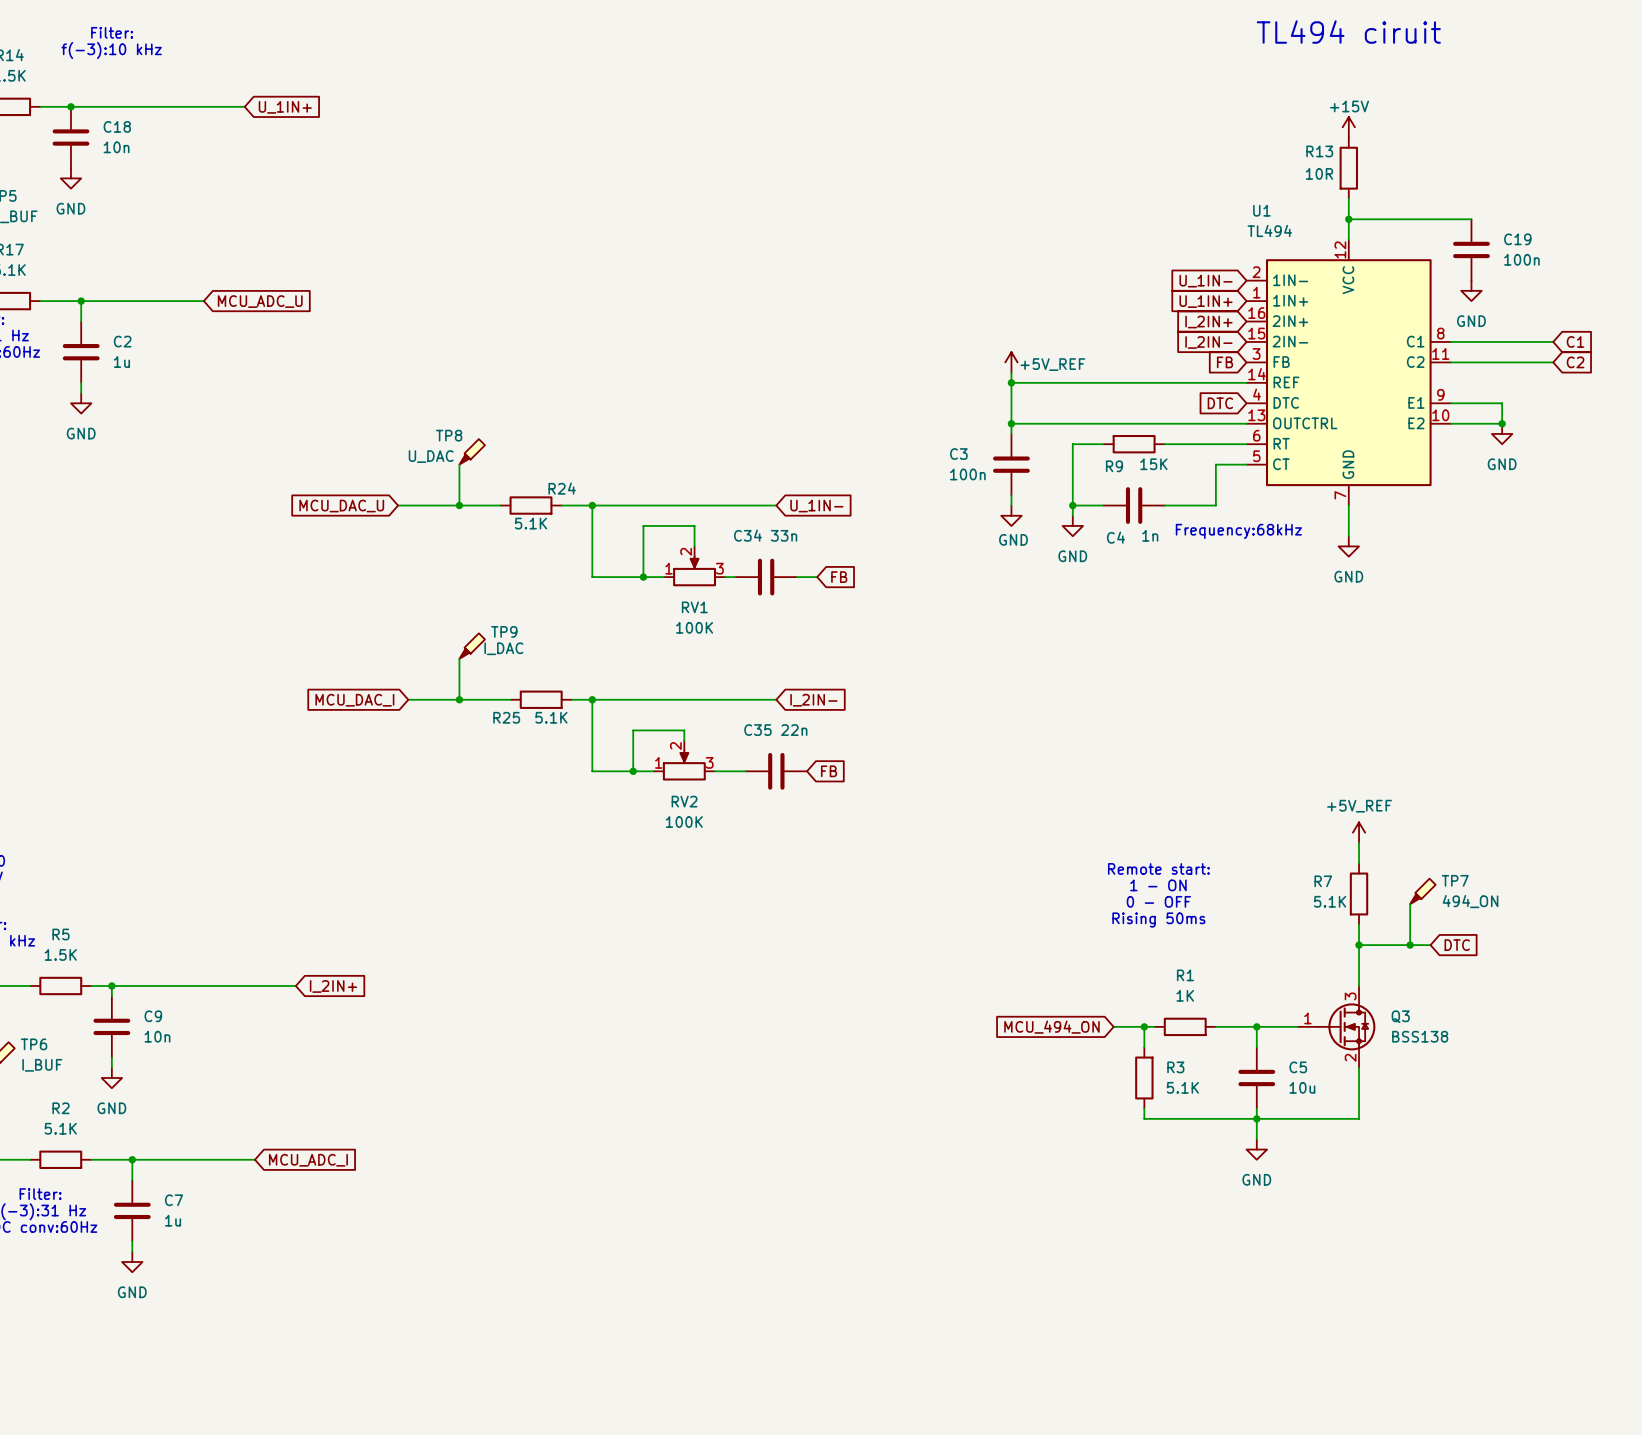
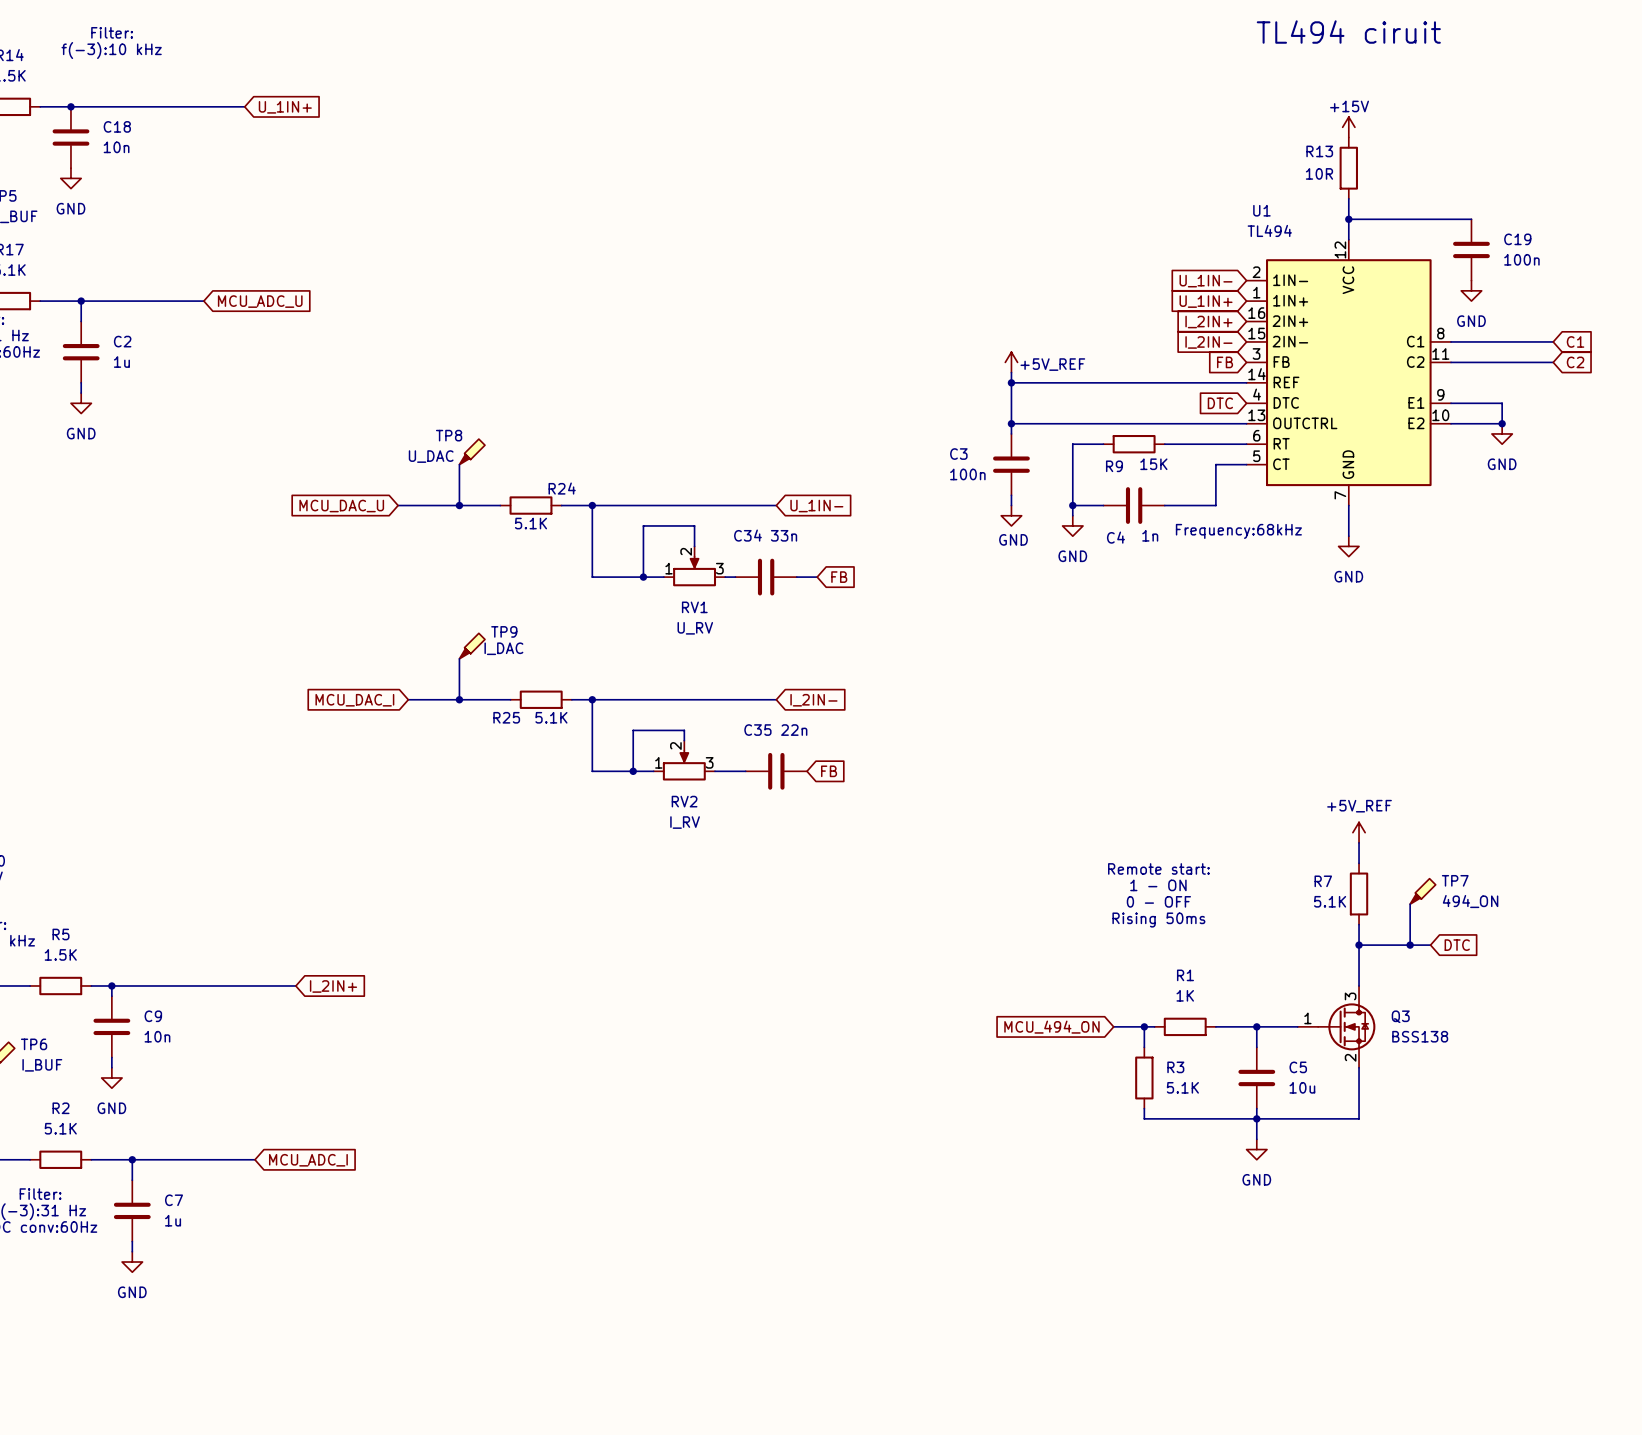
RV1 value: 100K (694, 627) -> U_RV (695, 628)
RV2 value: 100K (684, 822) -> I_RV (685, 822)

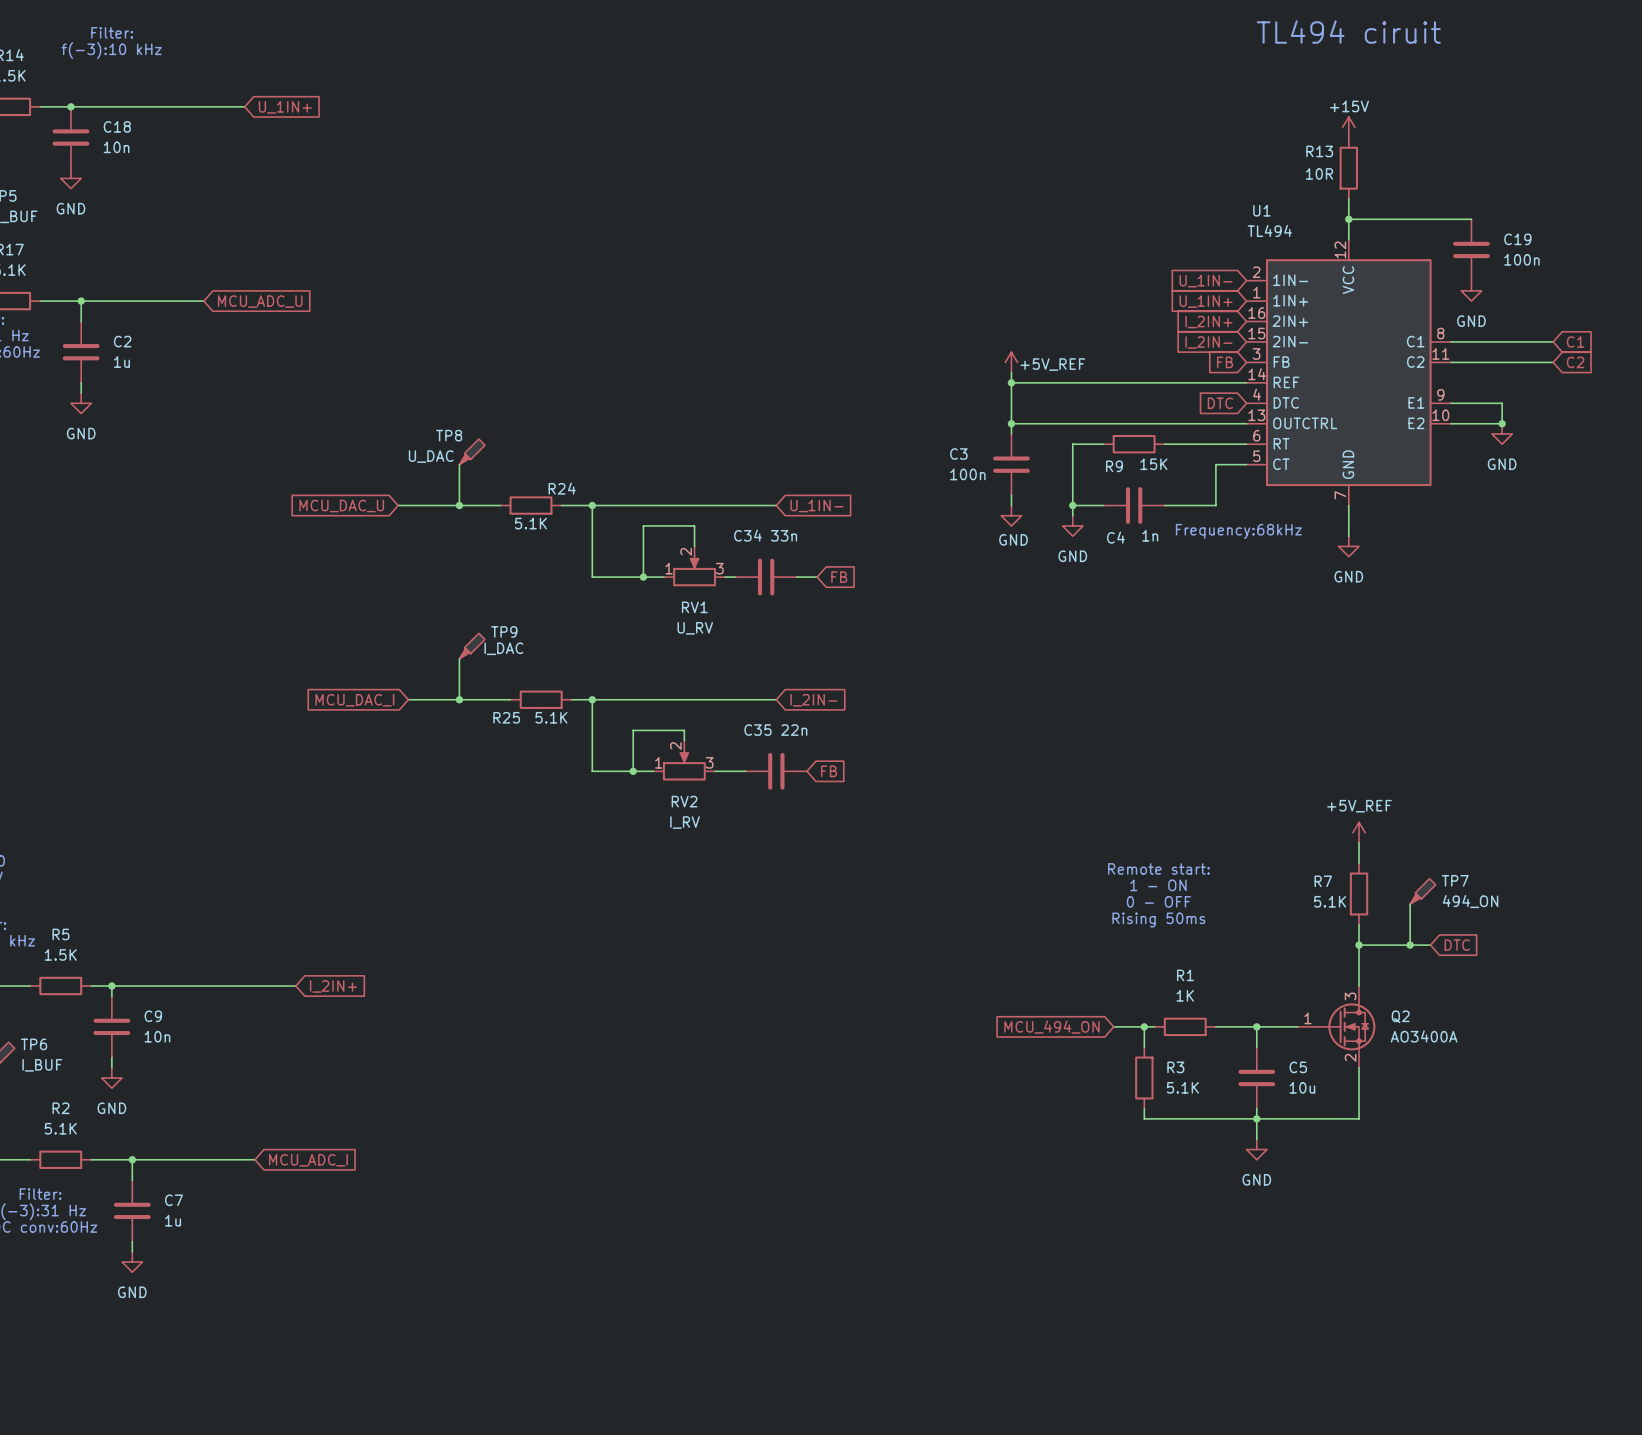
Q3 name: Q3 (1400, 1016) -> Q2 (1400, 1016)
Q3 value: BSS138 (1420, 1036) -> AO3400A (1424, 1036)

